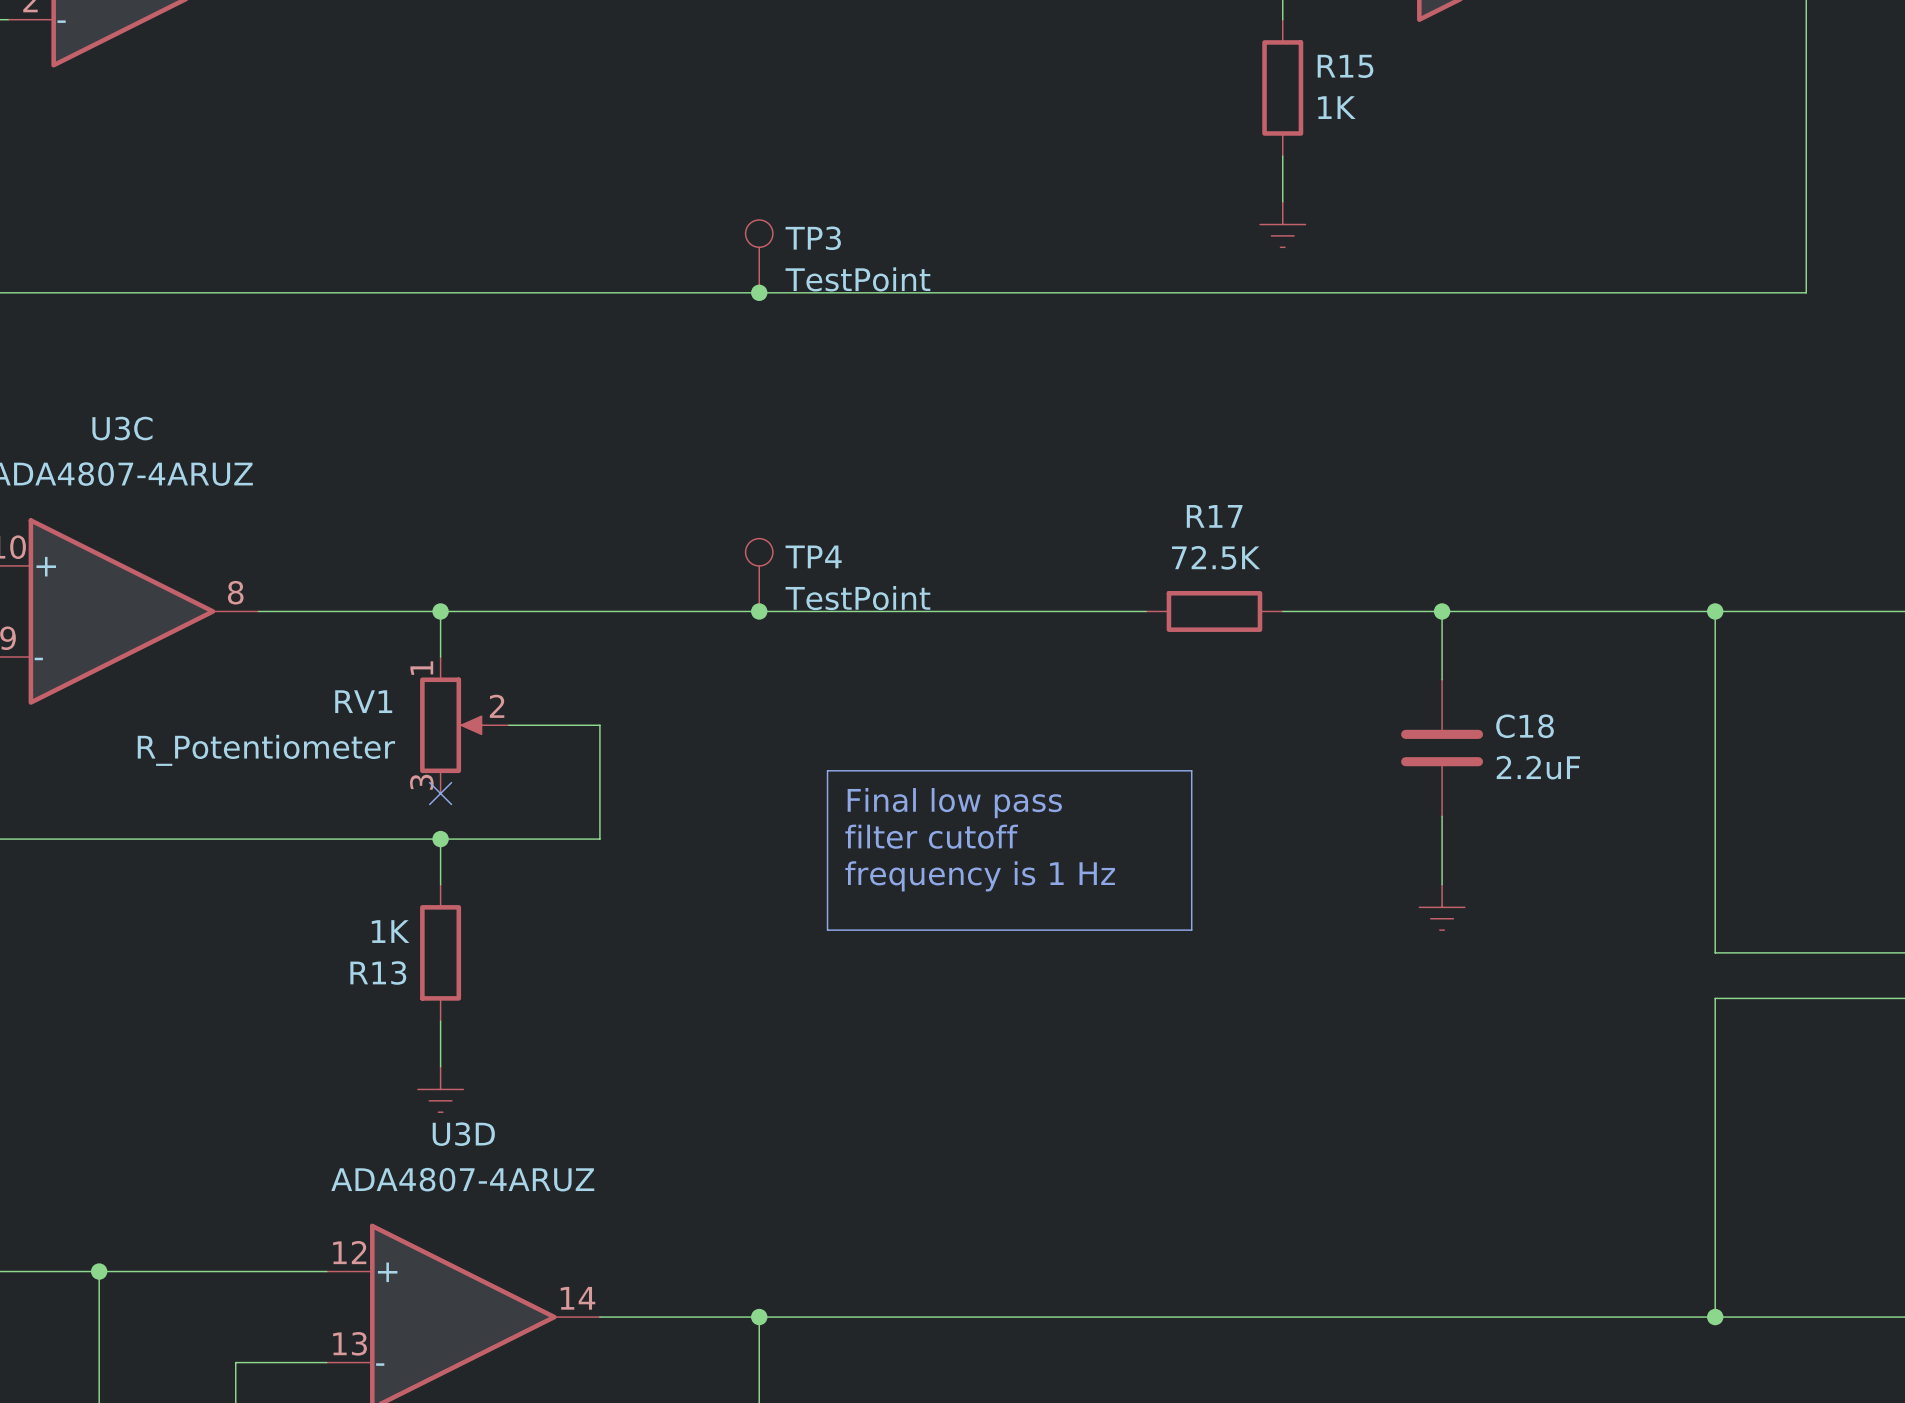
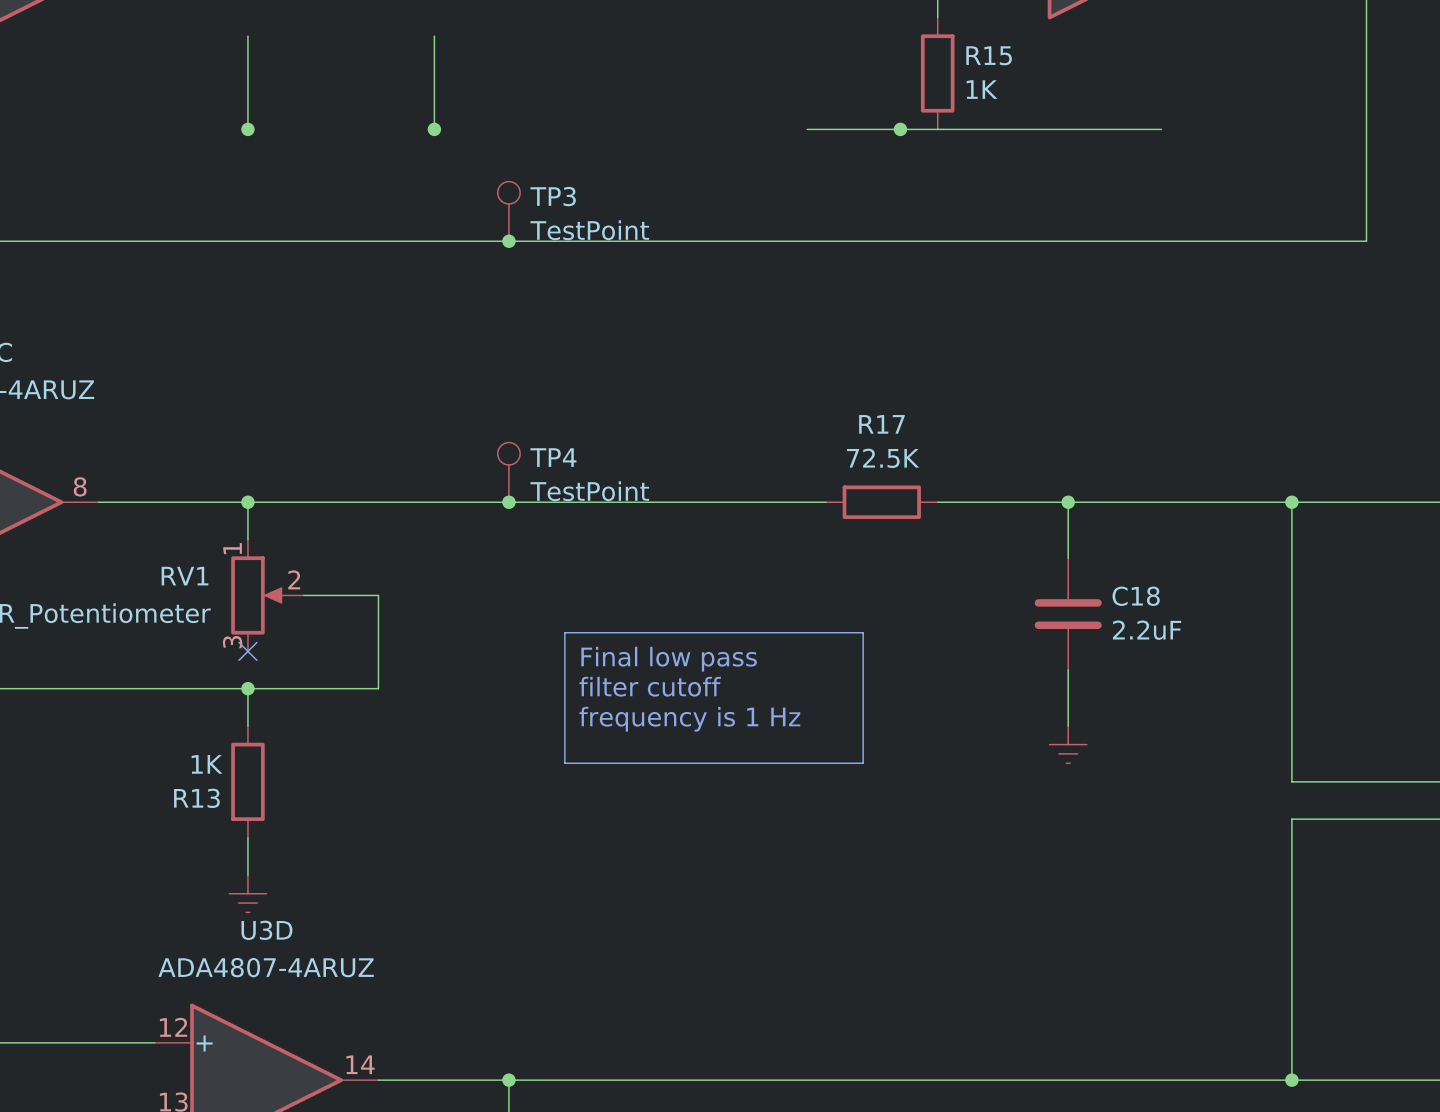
wire: none -> (247, 36) (247, 129)
wire: none -> (434, 36) (434, 129)
junction: none -> (247, 129)
junction: none -> (434, 129)
wire: none -> (807, 129) (1161, 129)
junction: none -> (900, 129)
wire: (1282, 156) (1282, 201) -> none
power symbol: (1282, 224) -> none

